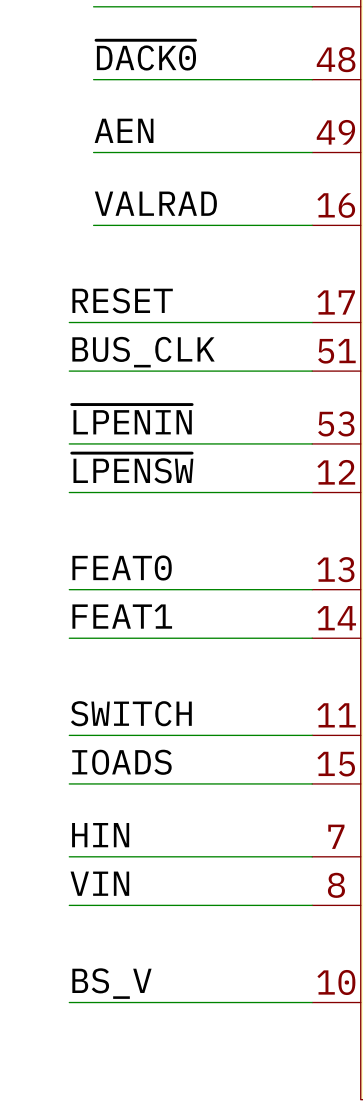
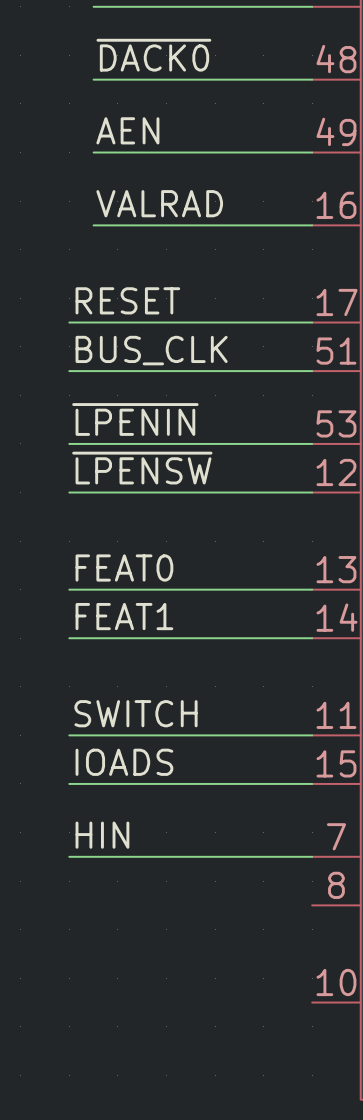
label: VIN (99, 883) -> none
wire: (69, 905) (312, 905) -> none
label: BS_V (111, 983) -> none
wire: (69, 1002) (312, 1002) -> none

